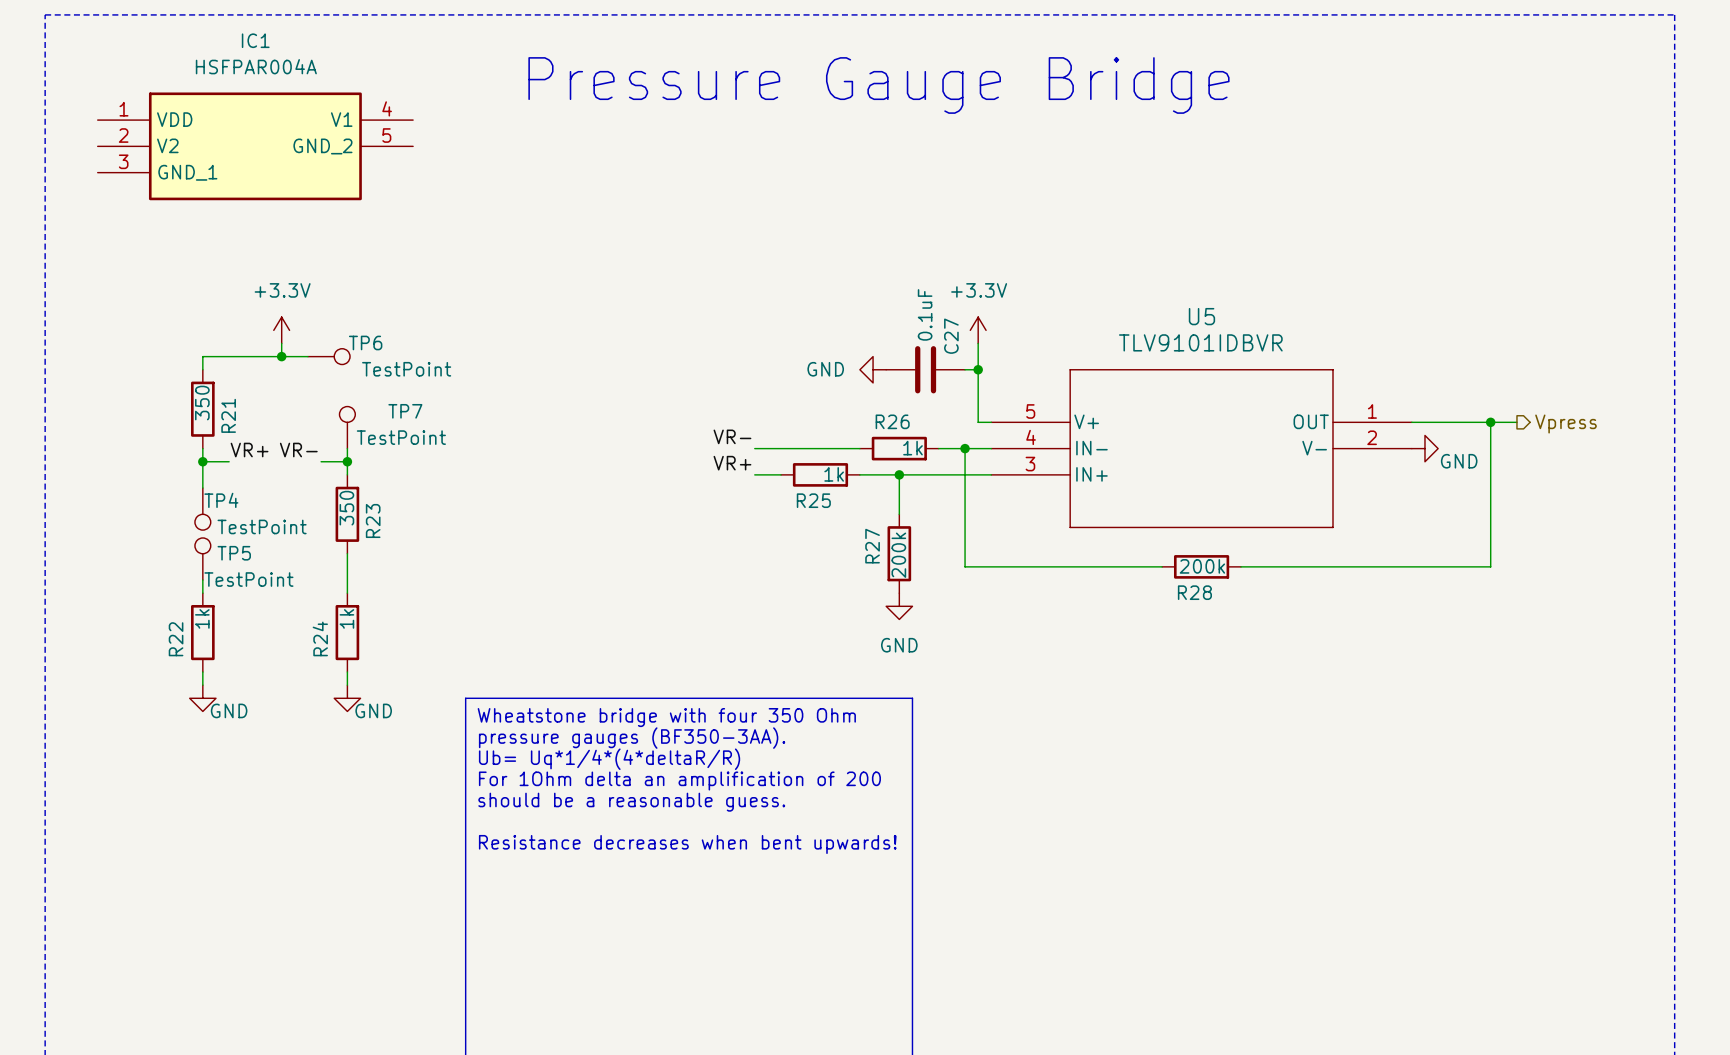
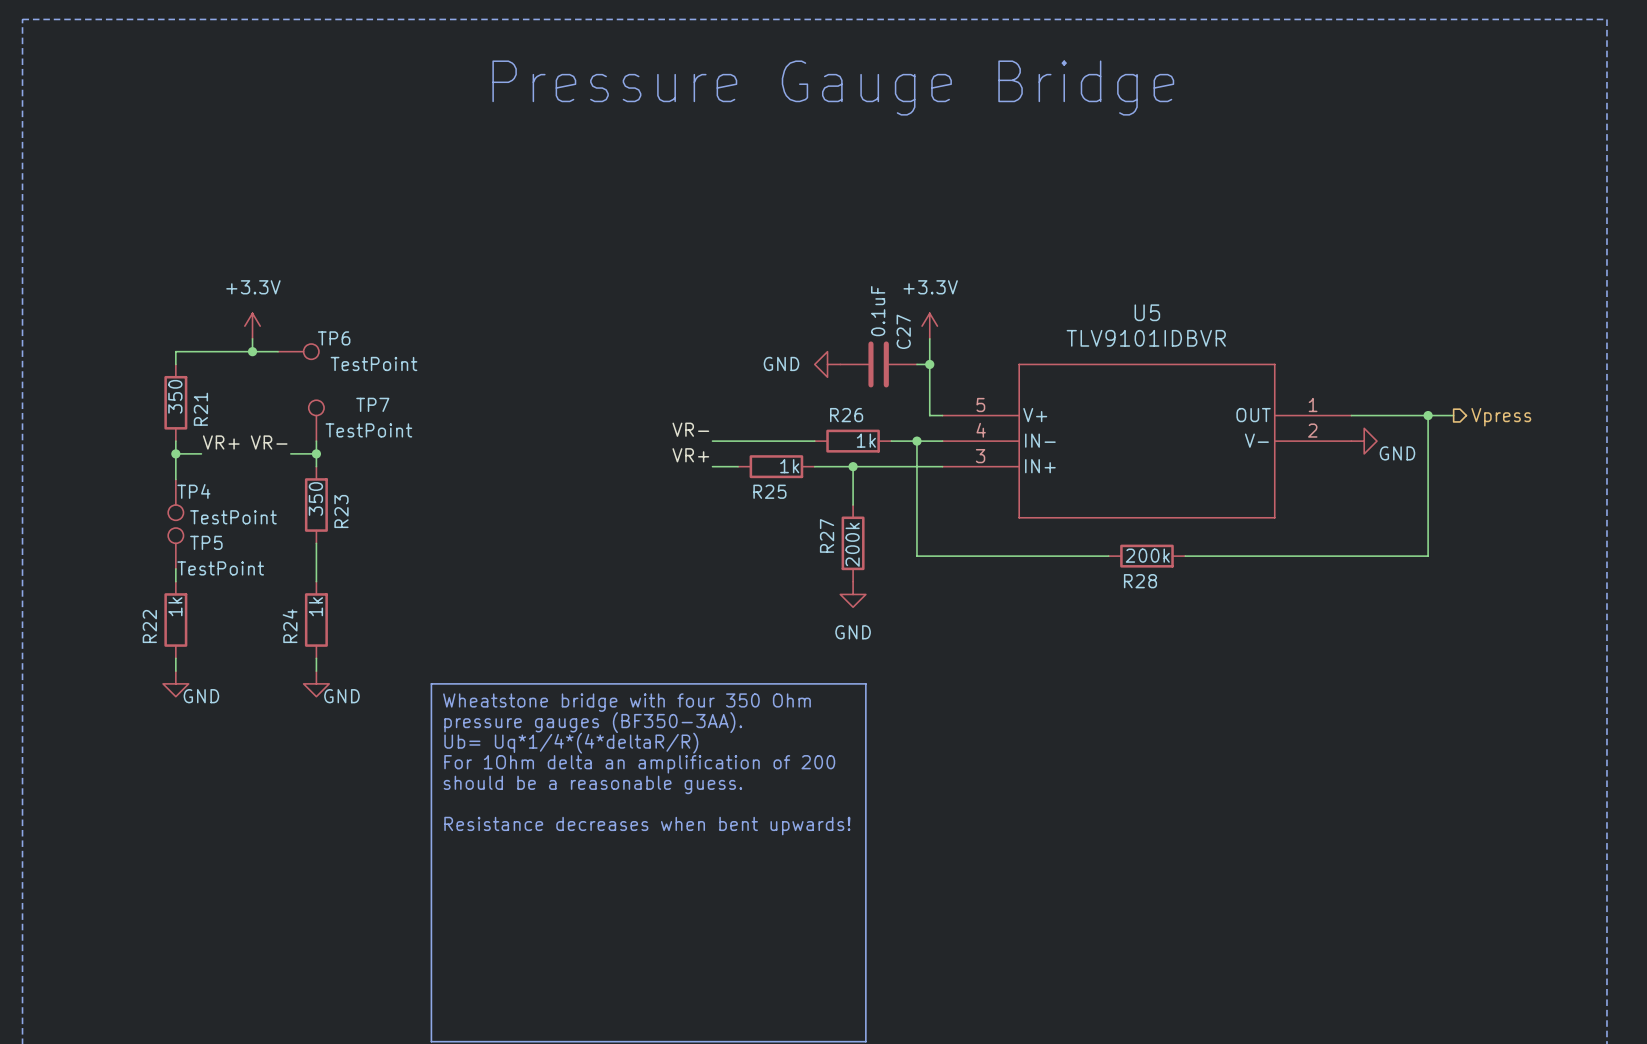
IC1: HSFPAR004A (255, 146) -> none

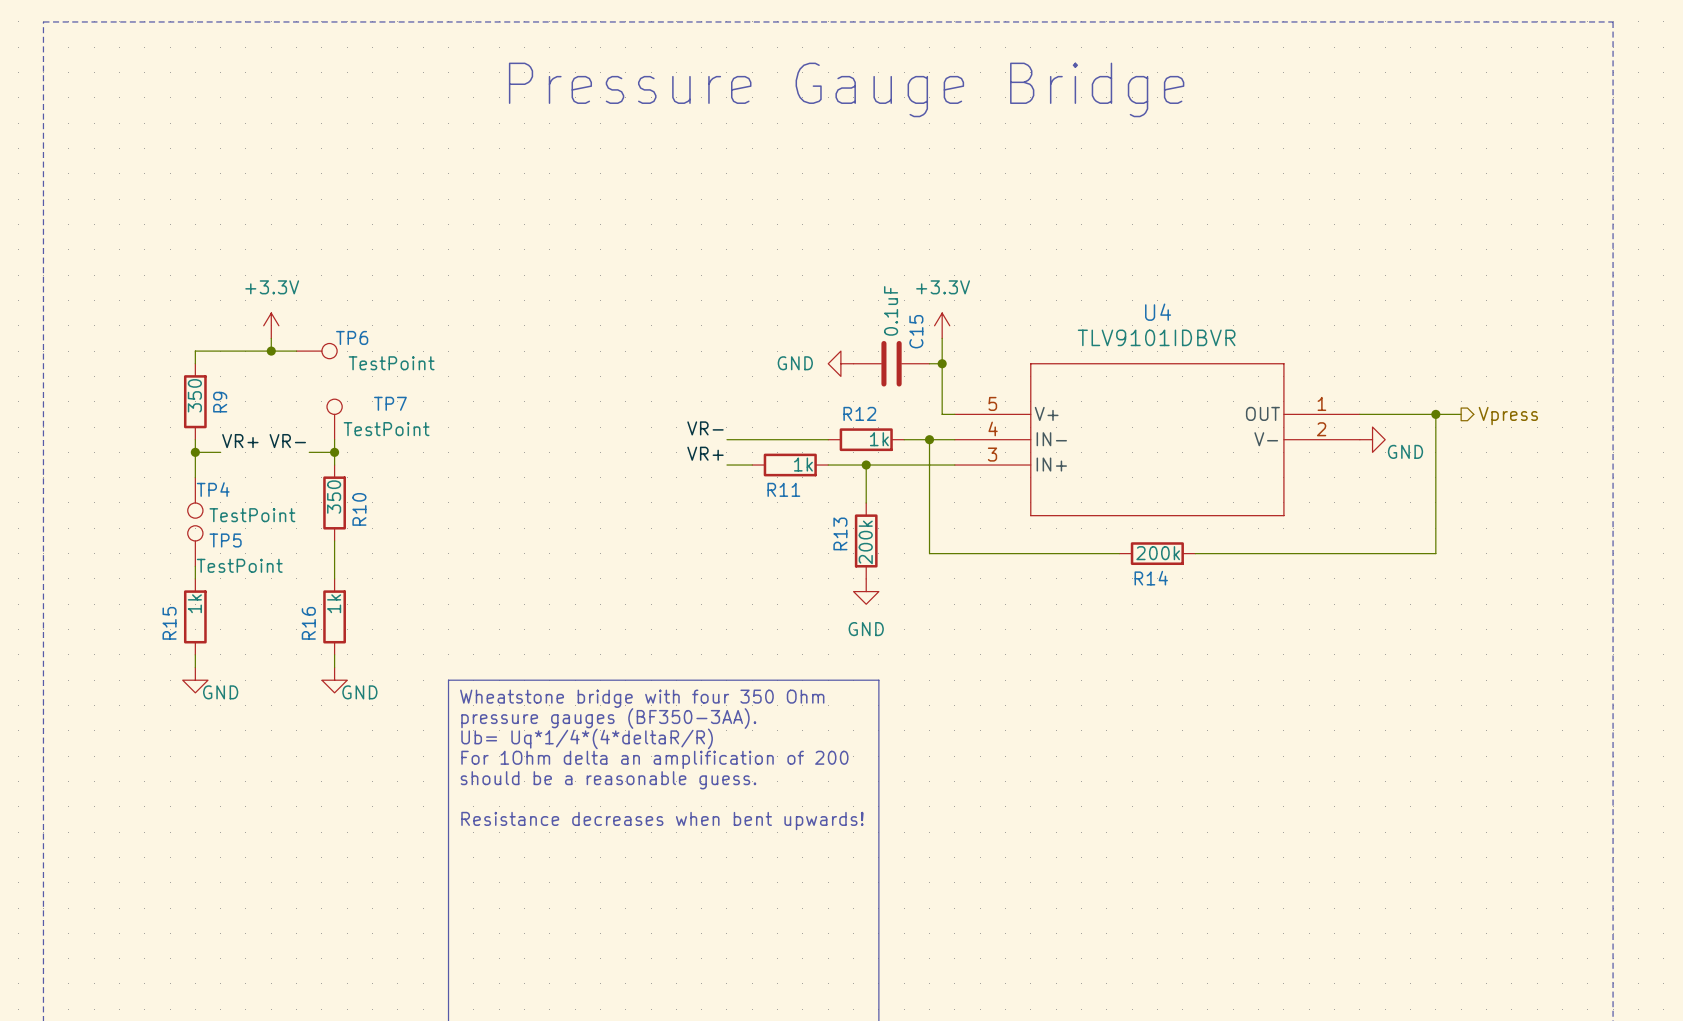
U5 name: U5 (1147, 312) -> U4 (1158, 312)
C27 name: C27 (903, 331) -> C15 (916, 331)
R21 name: R21 (200, 409) -> R9 (220, 402)
R26 name: R26 (846, 415) -> R12 (859, 413)
R25 name: R25 (769, 491) -> R11 (783, 489)
R23 name: R23 (341, 511) -> R10 (359, 509)
R27 name: R27 (827, 535) -> R13 (840, 533)
R28 name: R28 (1140, 581) -> R14 (1151, 578)
R22 name: R22 (149, 626) -> R15 (169, 623)
R24 name: R24 (290, 626) -> R16 (308, 623)

